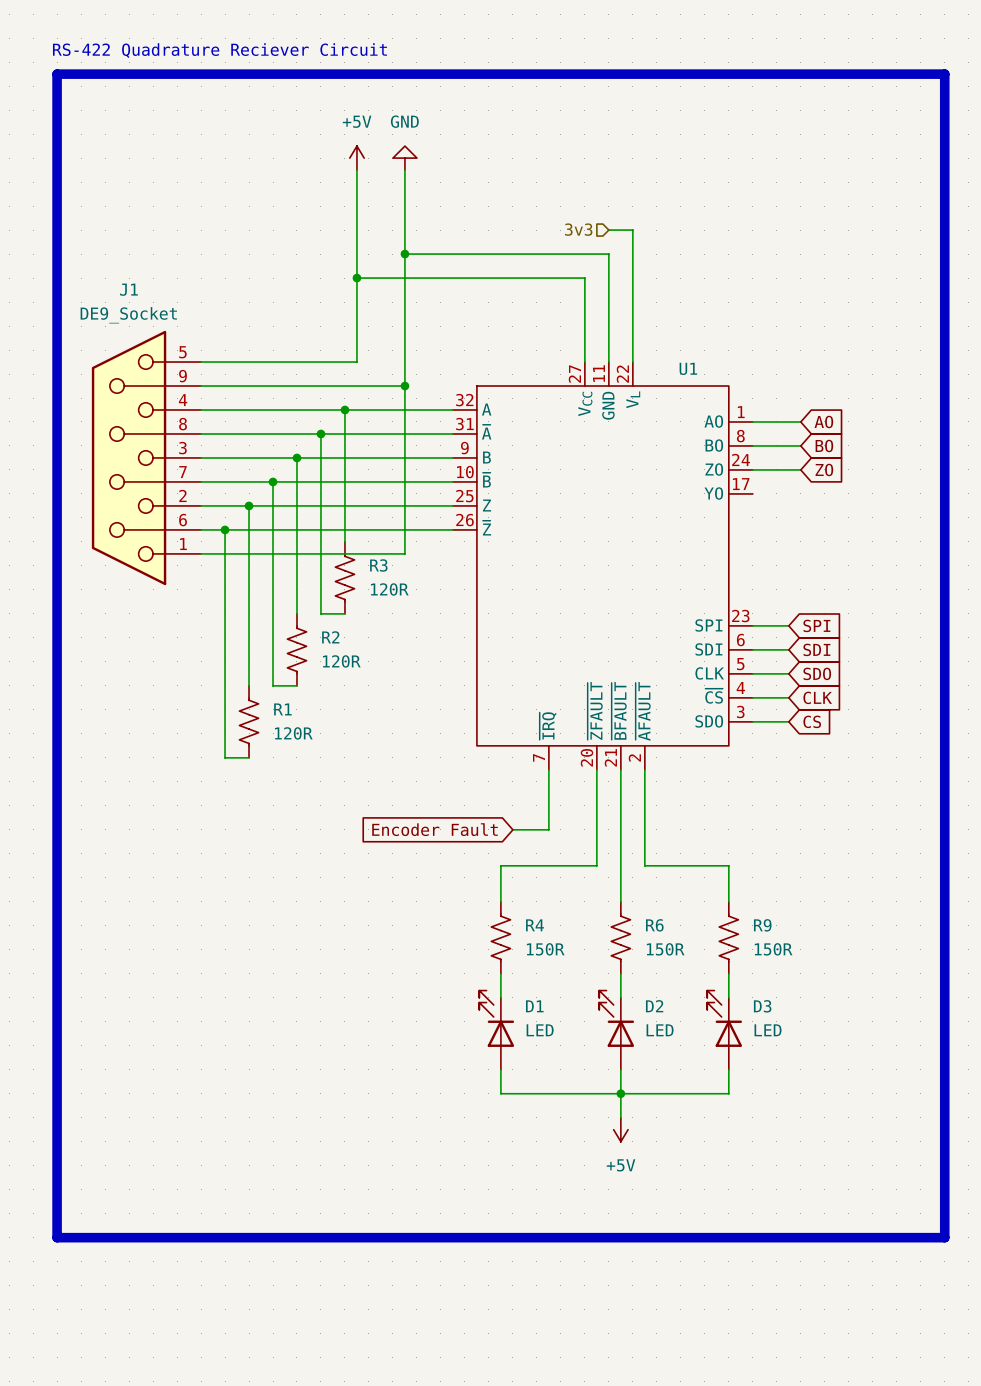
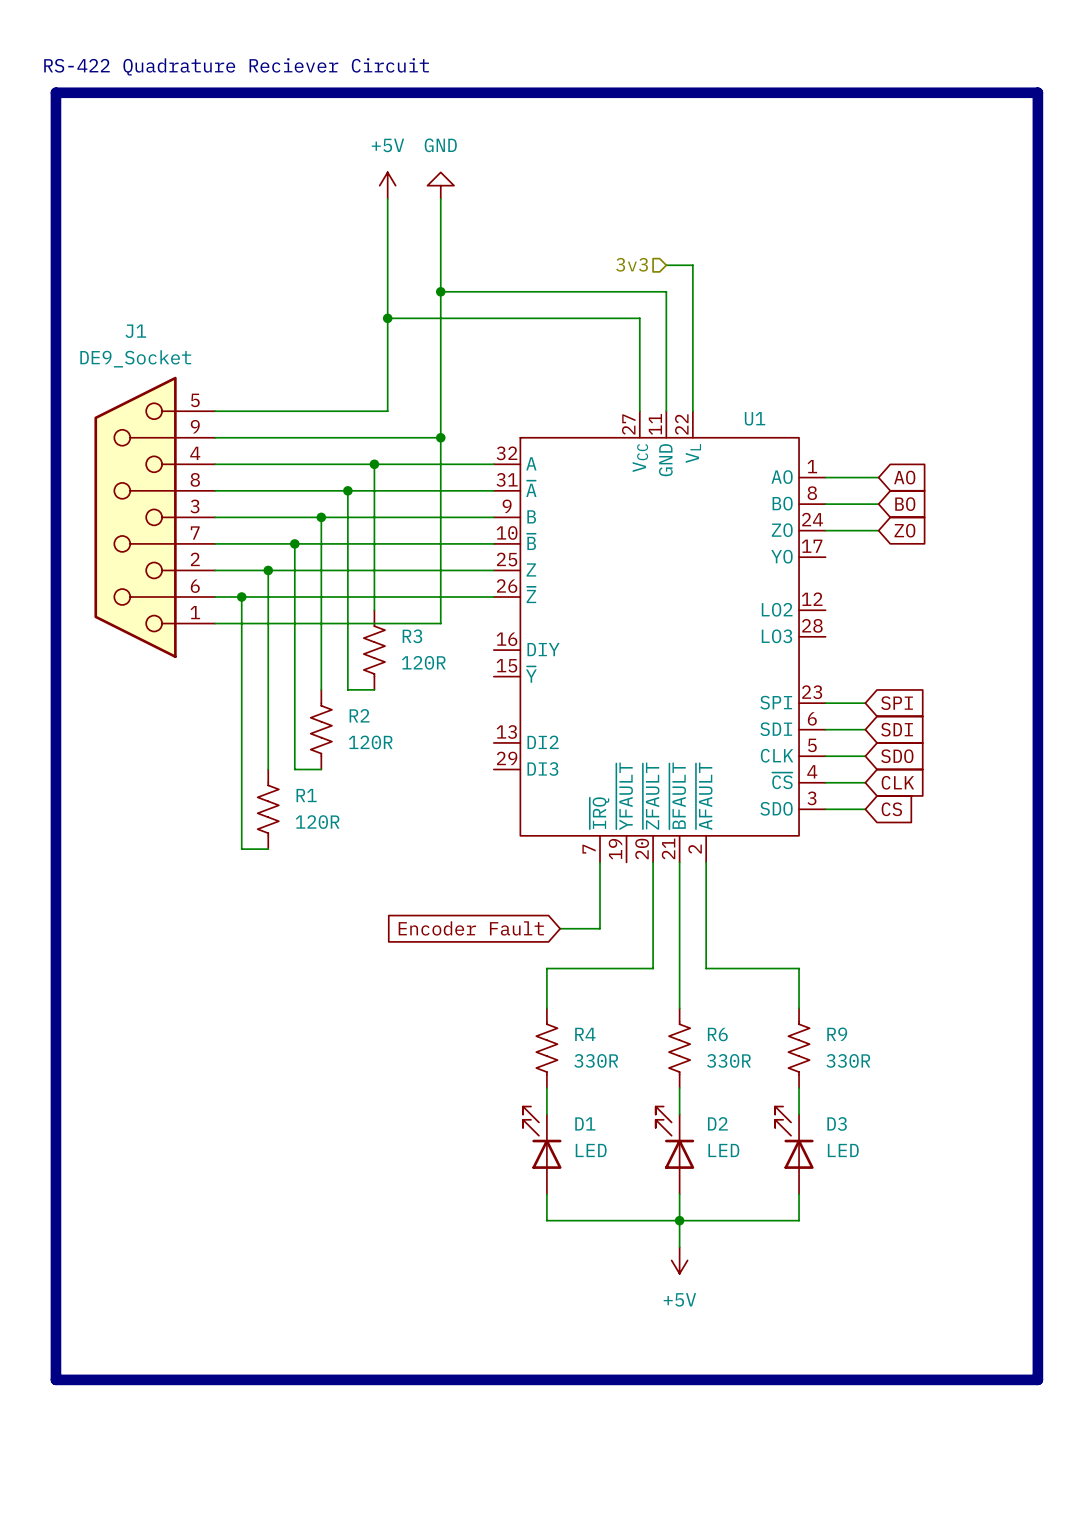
U1 symbol: [452, 362, 753, 770] -> [493, 411, 826, 863]
R4 value: 150R (545, 949) -> 330R (596, 1060)
R6 value: 150R (665, 949) -> 330R (728, 1060)
R9 value: 150R (773, 949) -> 330R (848, 1060)

